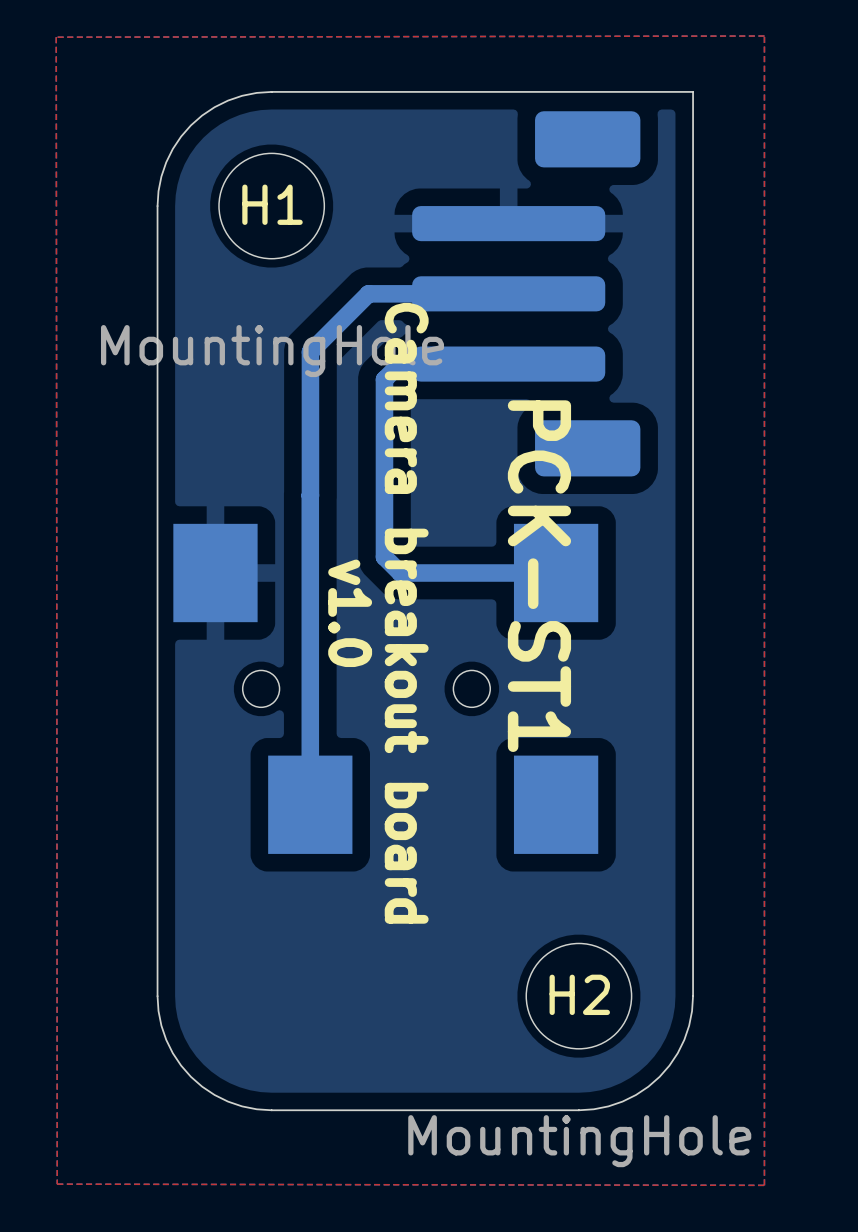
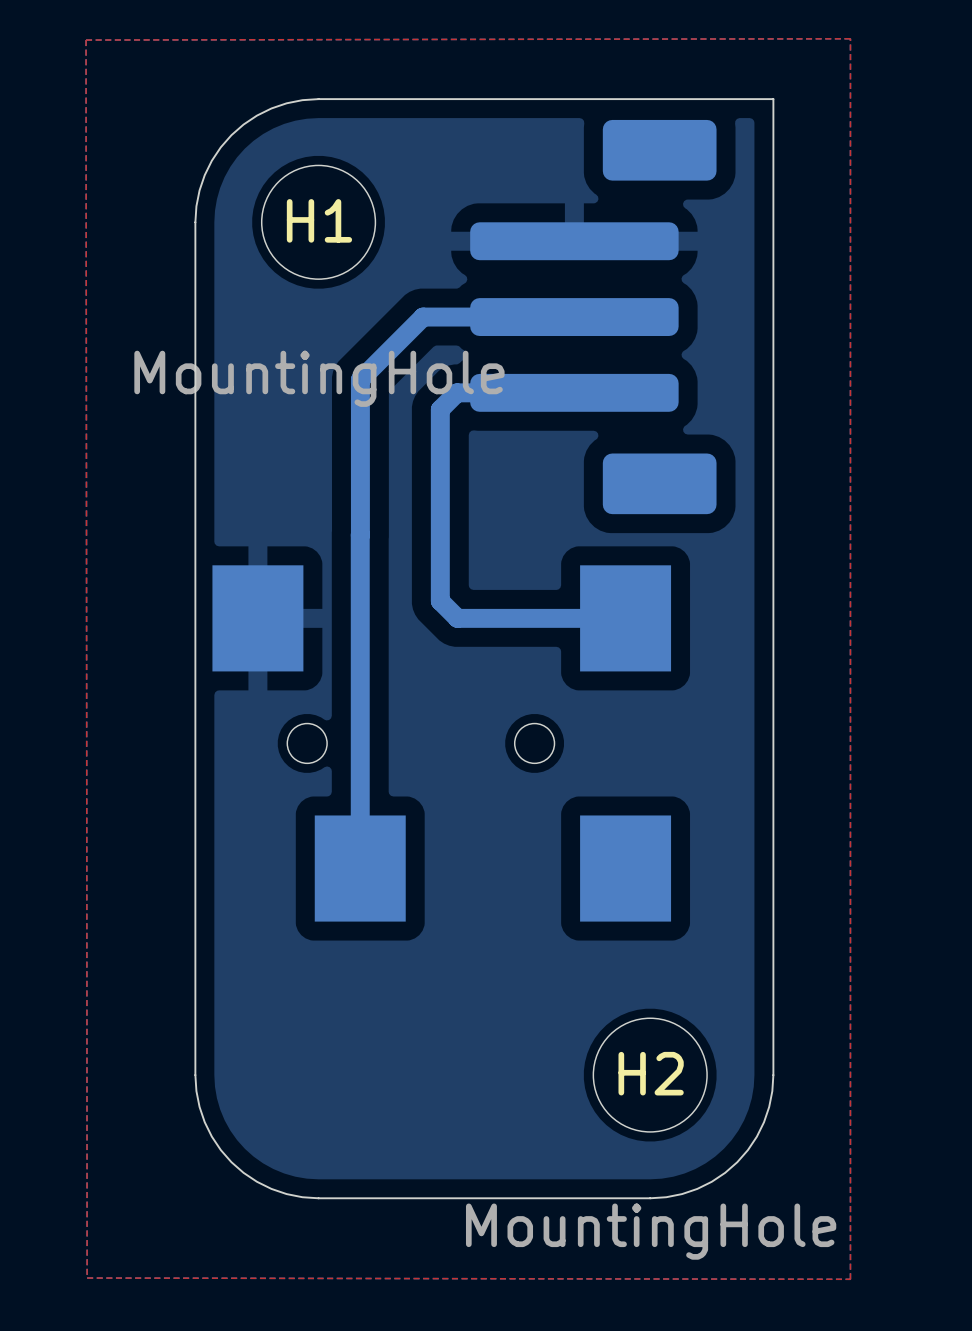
text: PCK-ST1 (539, 576) -> none
text: v1.0 (350, 613) -> none
text: Camera breakout board (406, 613) -> none

